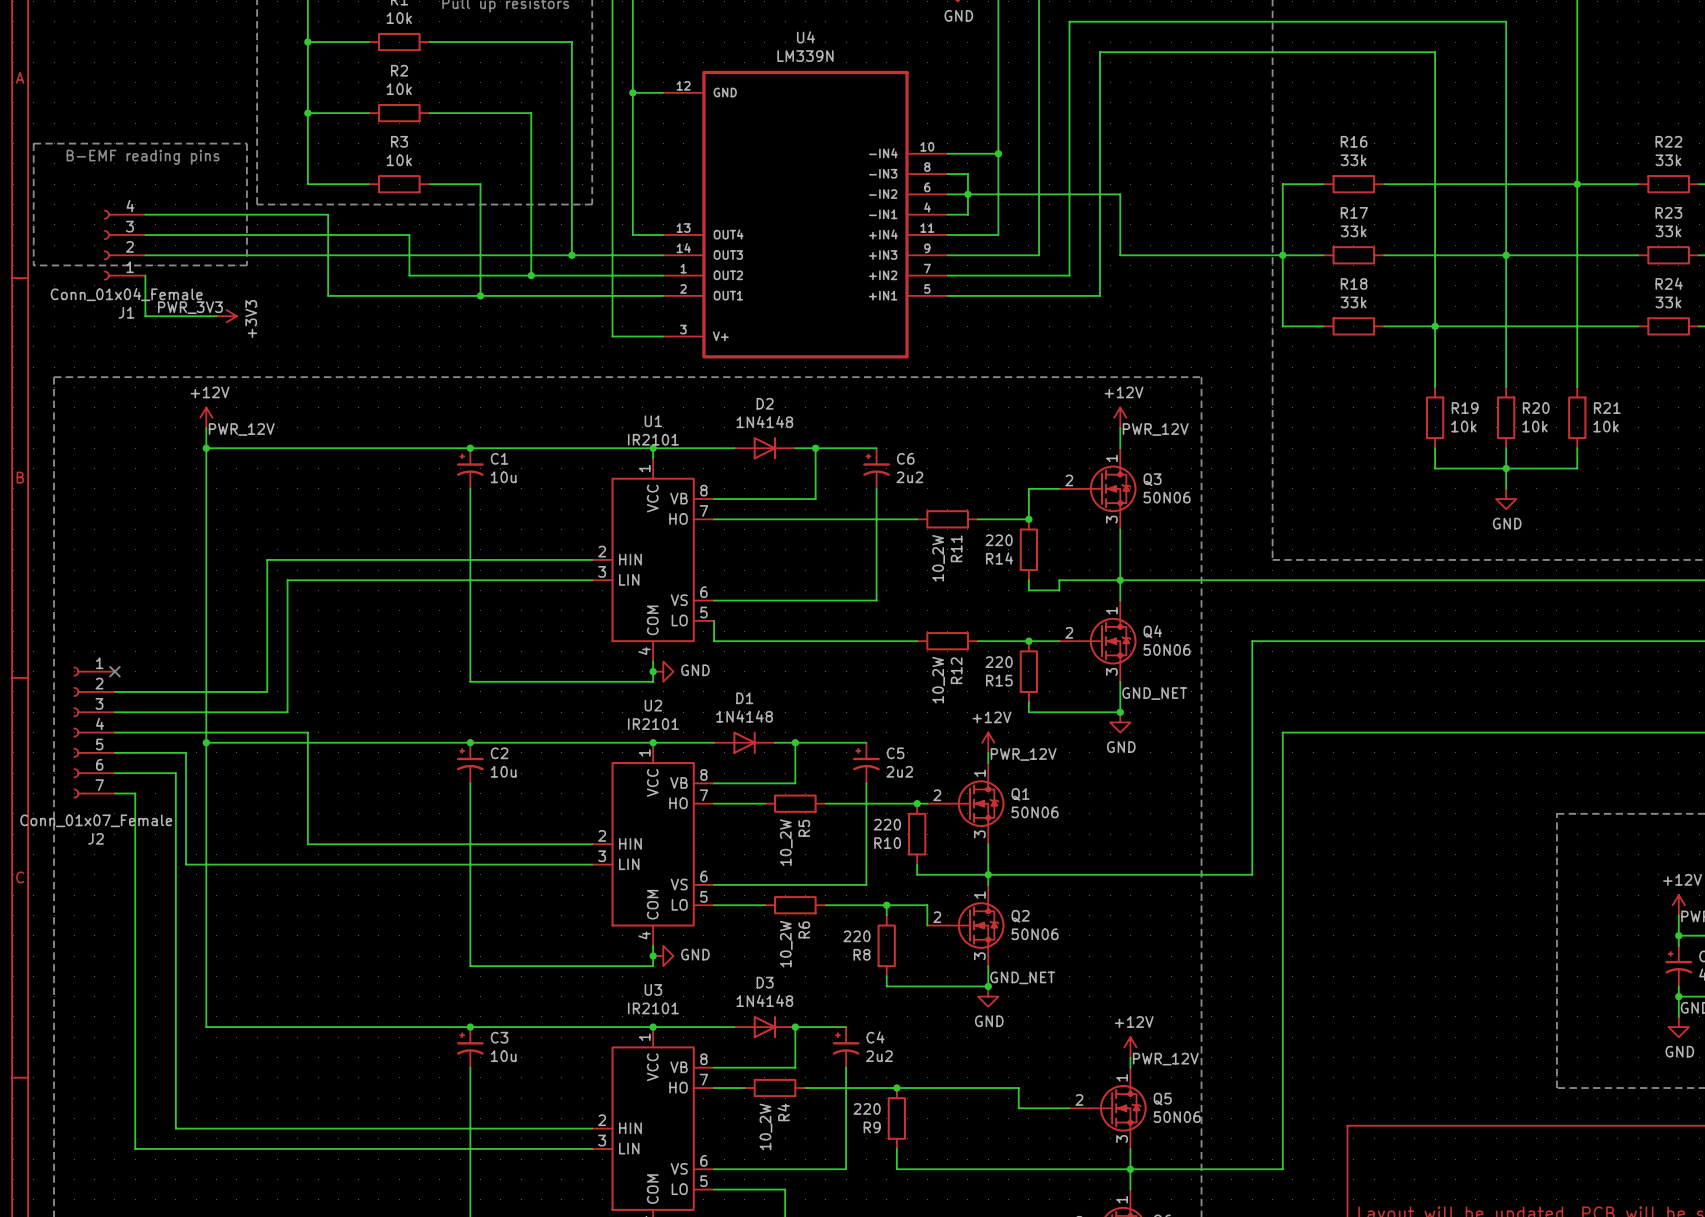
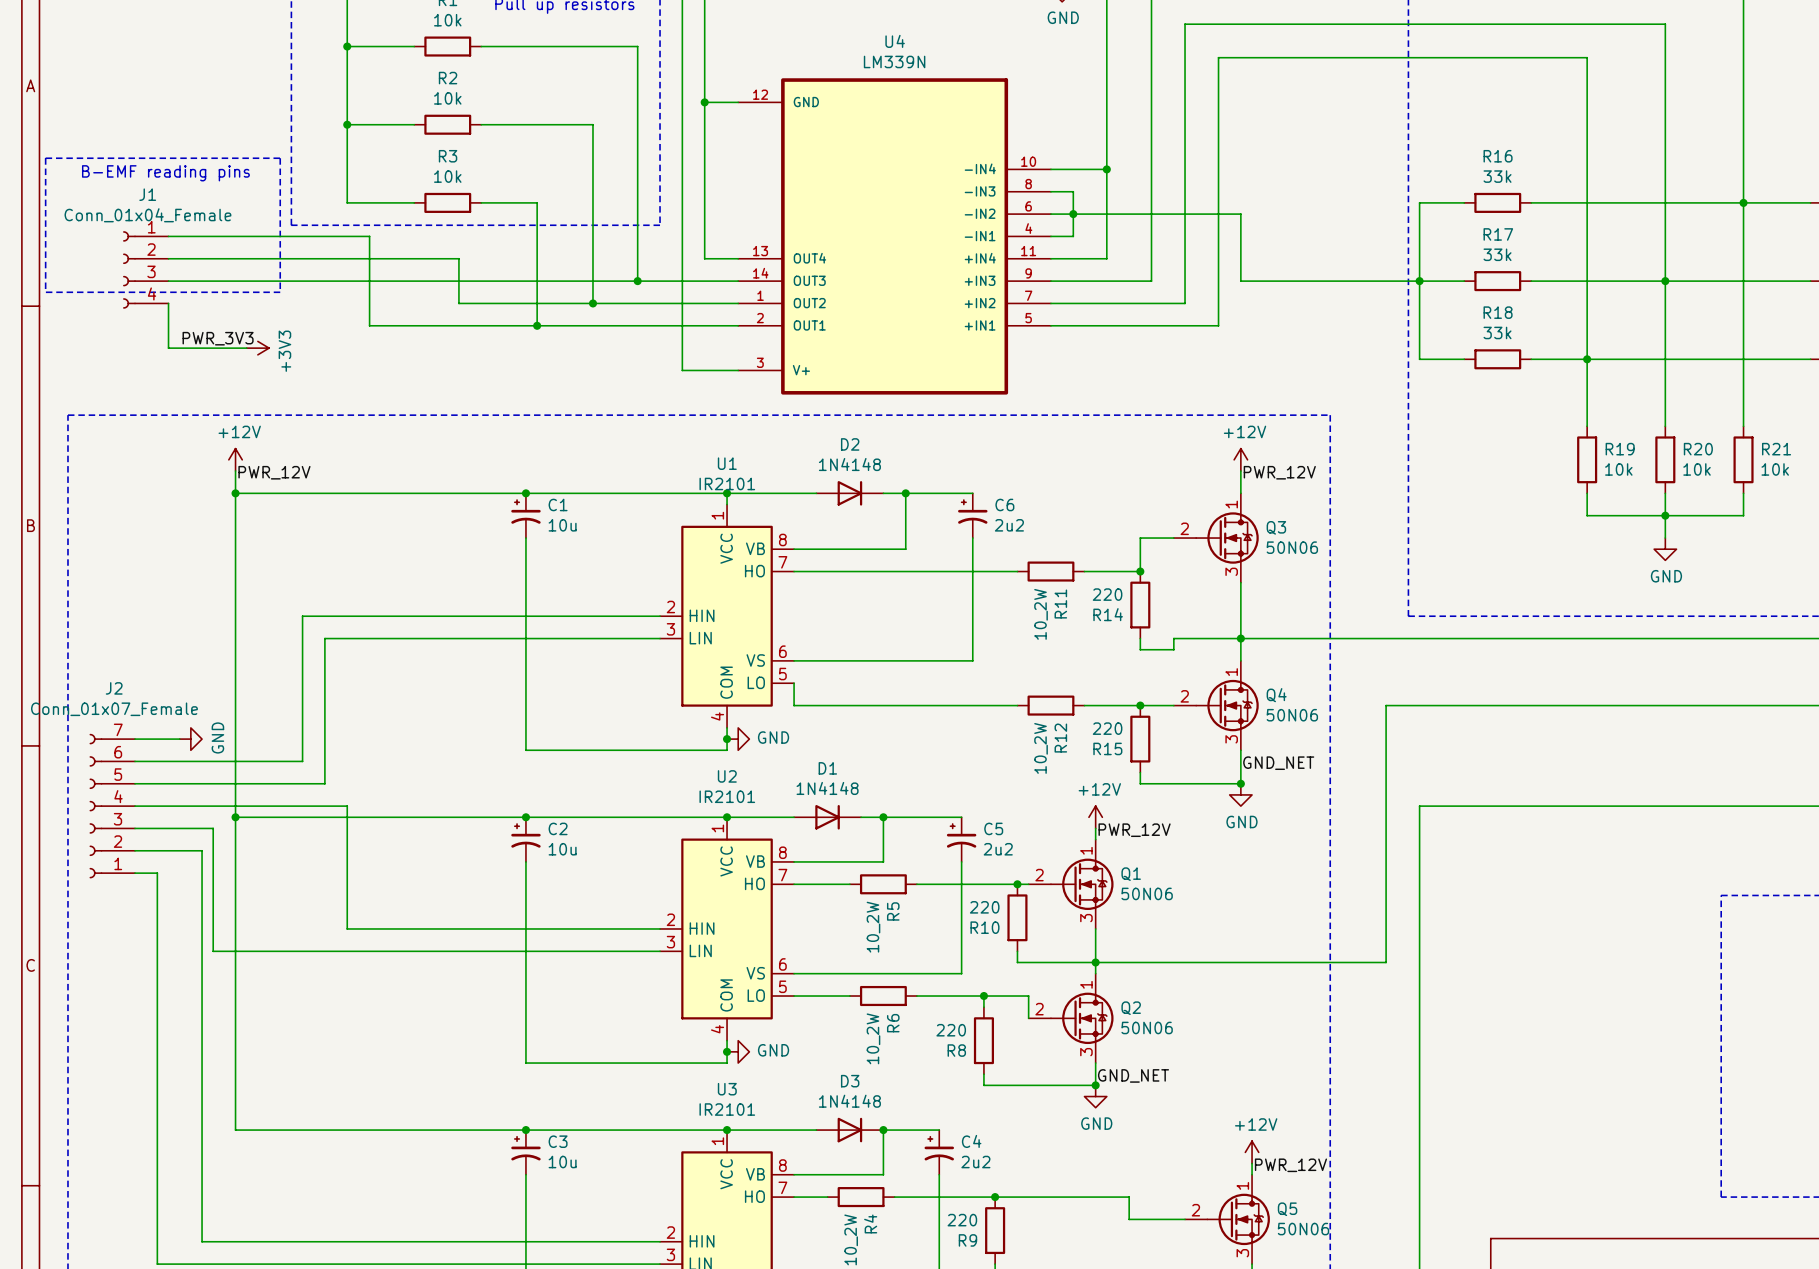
J1 flip: as is (109, 245) -> up-down (129, 269)
wire: none -> (135, 739) (179, 739)
no-connect mark: (114, 671) -> none
power symbol: none -> GND (190, 739)
J2 flip: as is (79, 732) -> up-down (95, 806)

